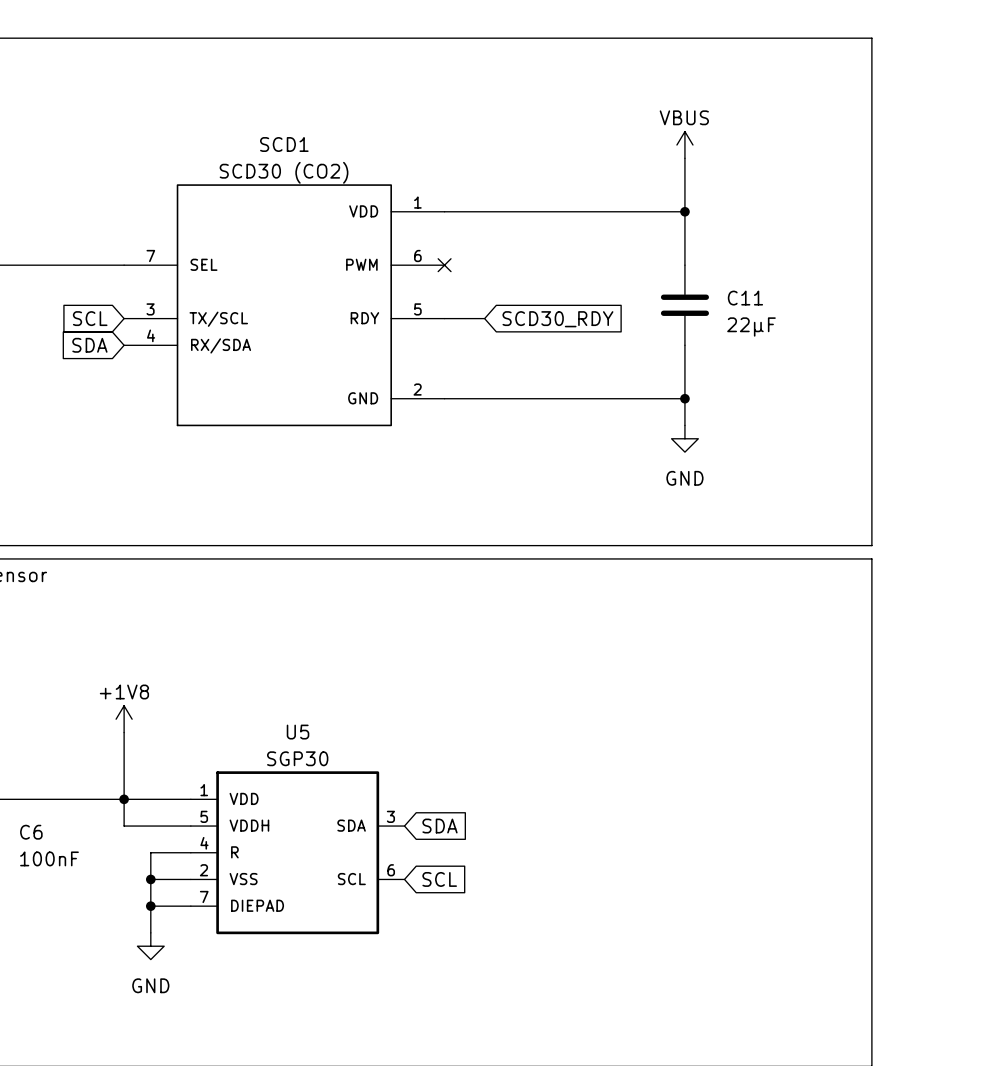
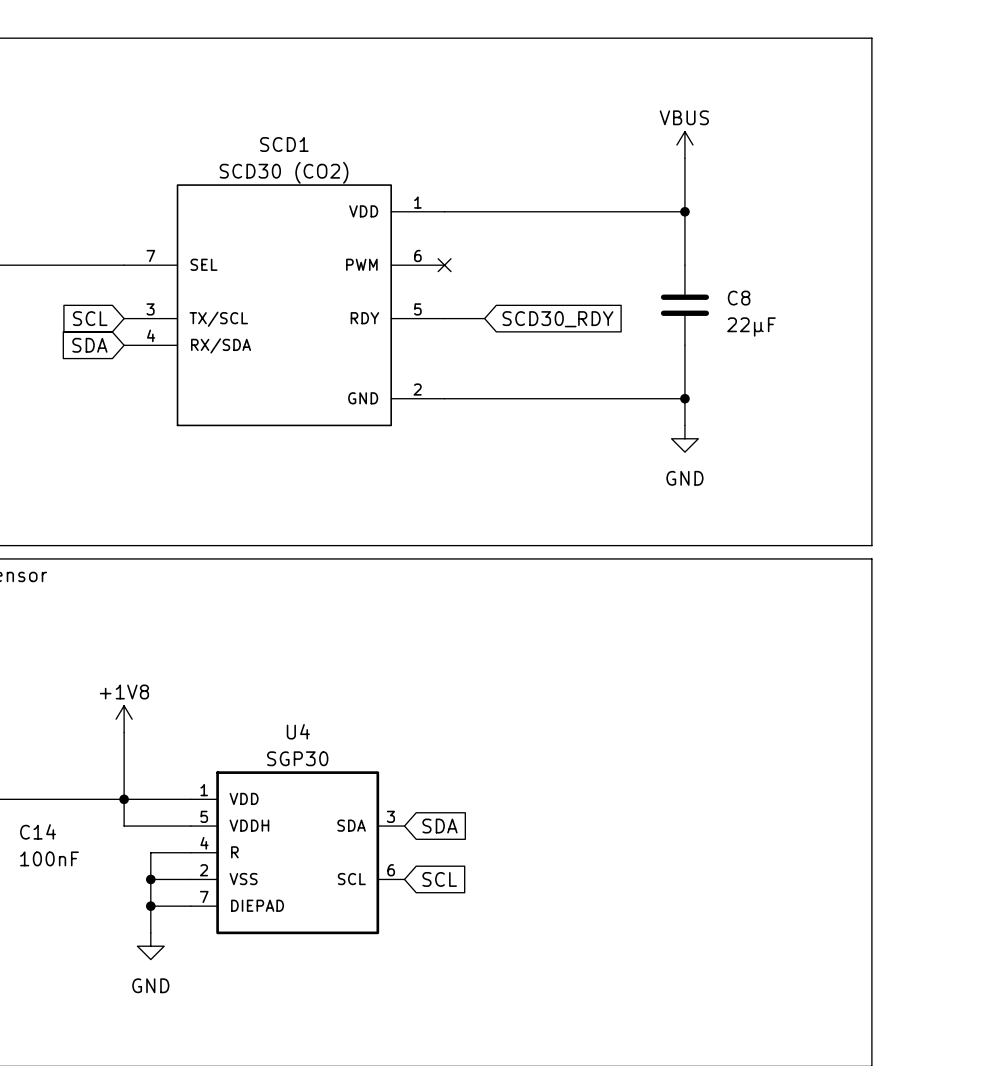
C11 name: C11 (745, 298) -> C8 (739, 298)
U5 name: U5 (298, 732) -> U4 (298, 731)
C6 name: C6 (31, 832) -> C14 (38, 831)

